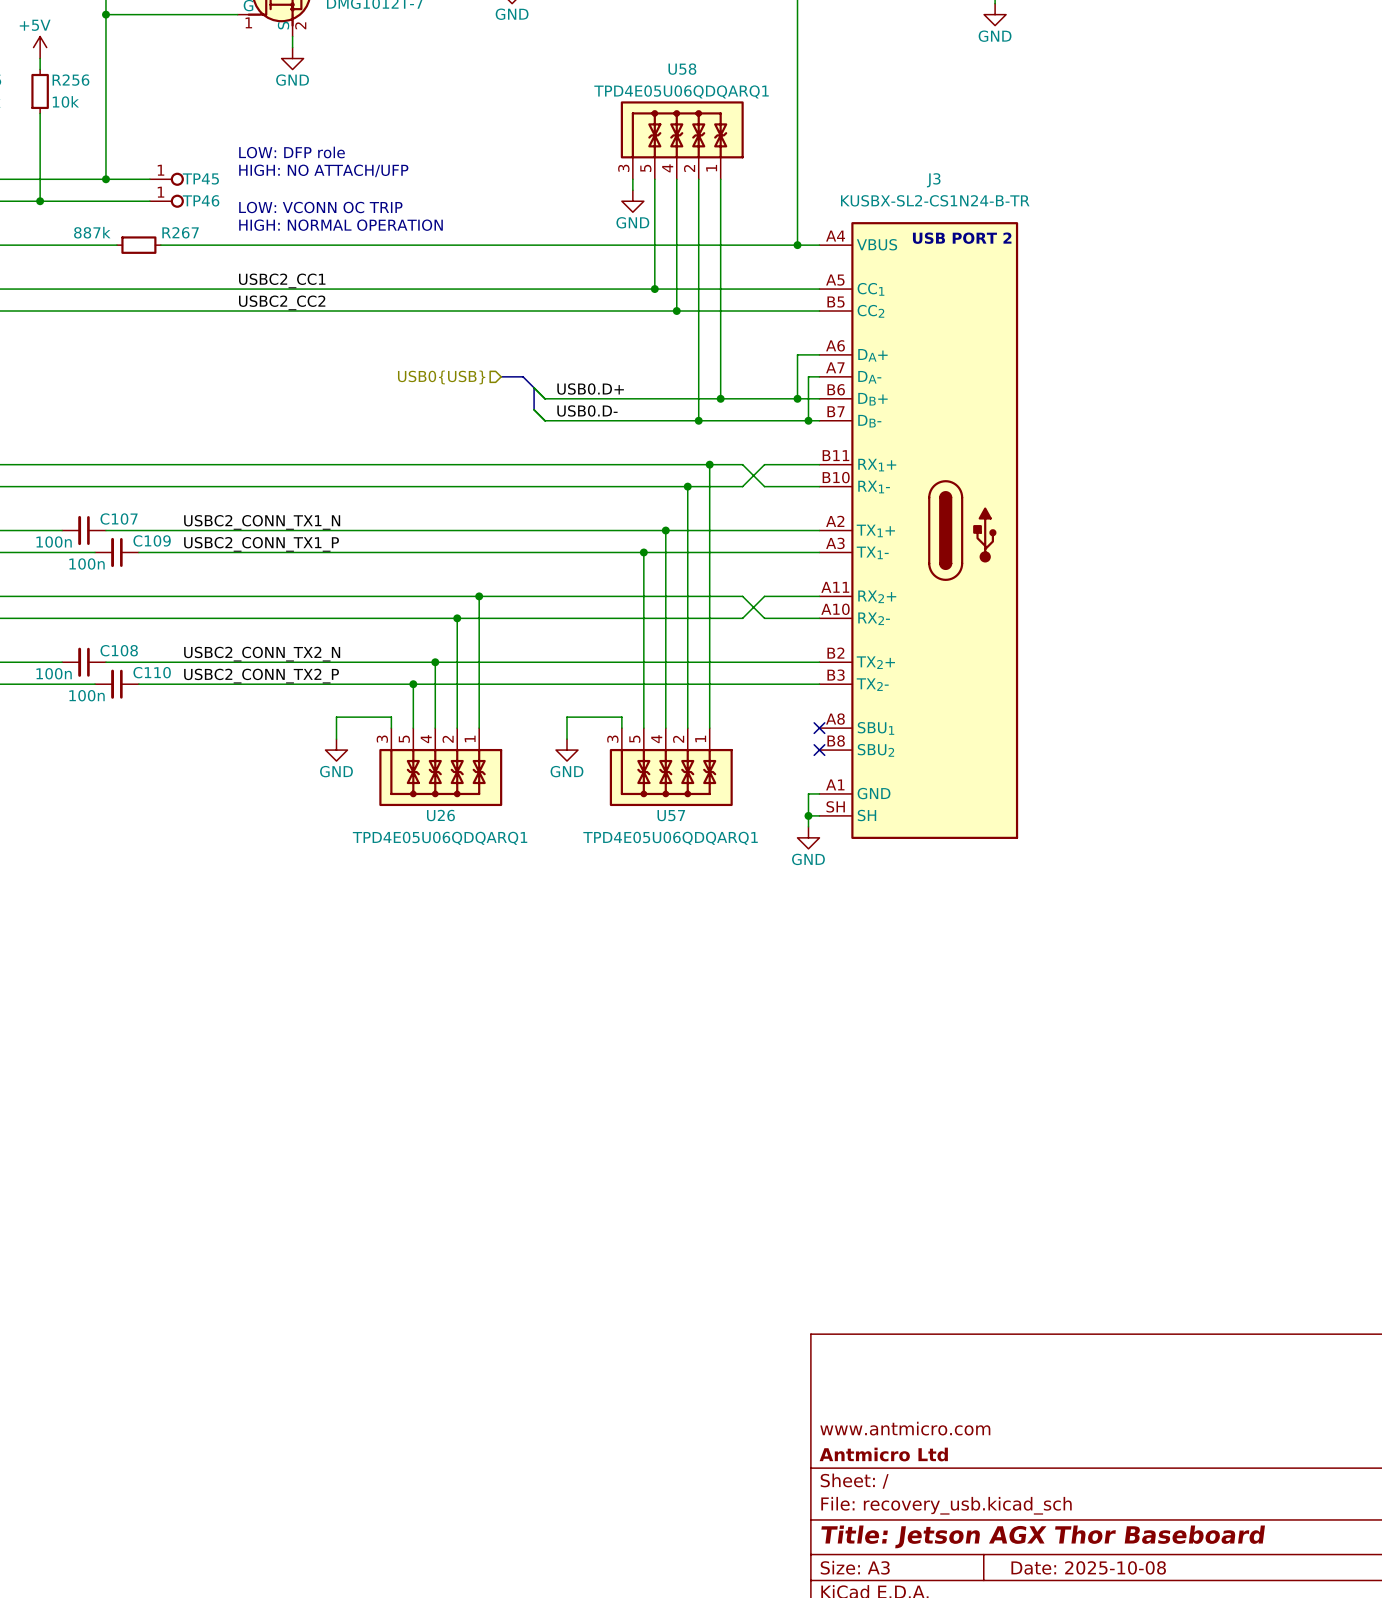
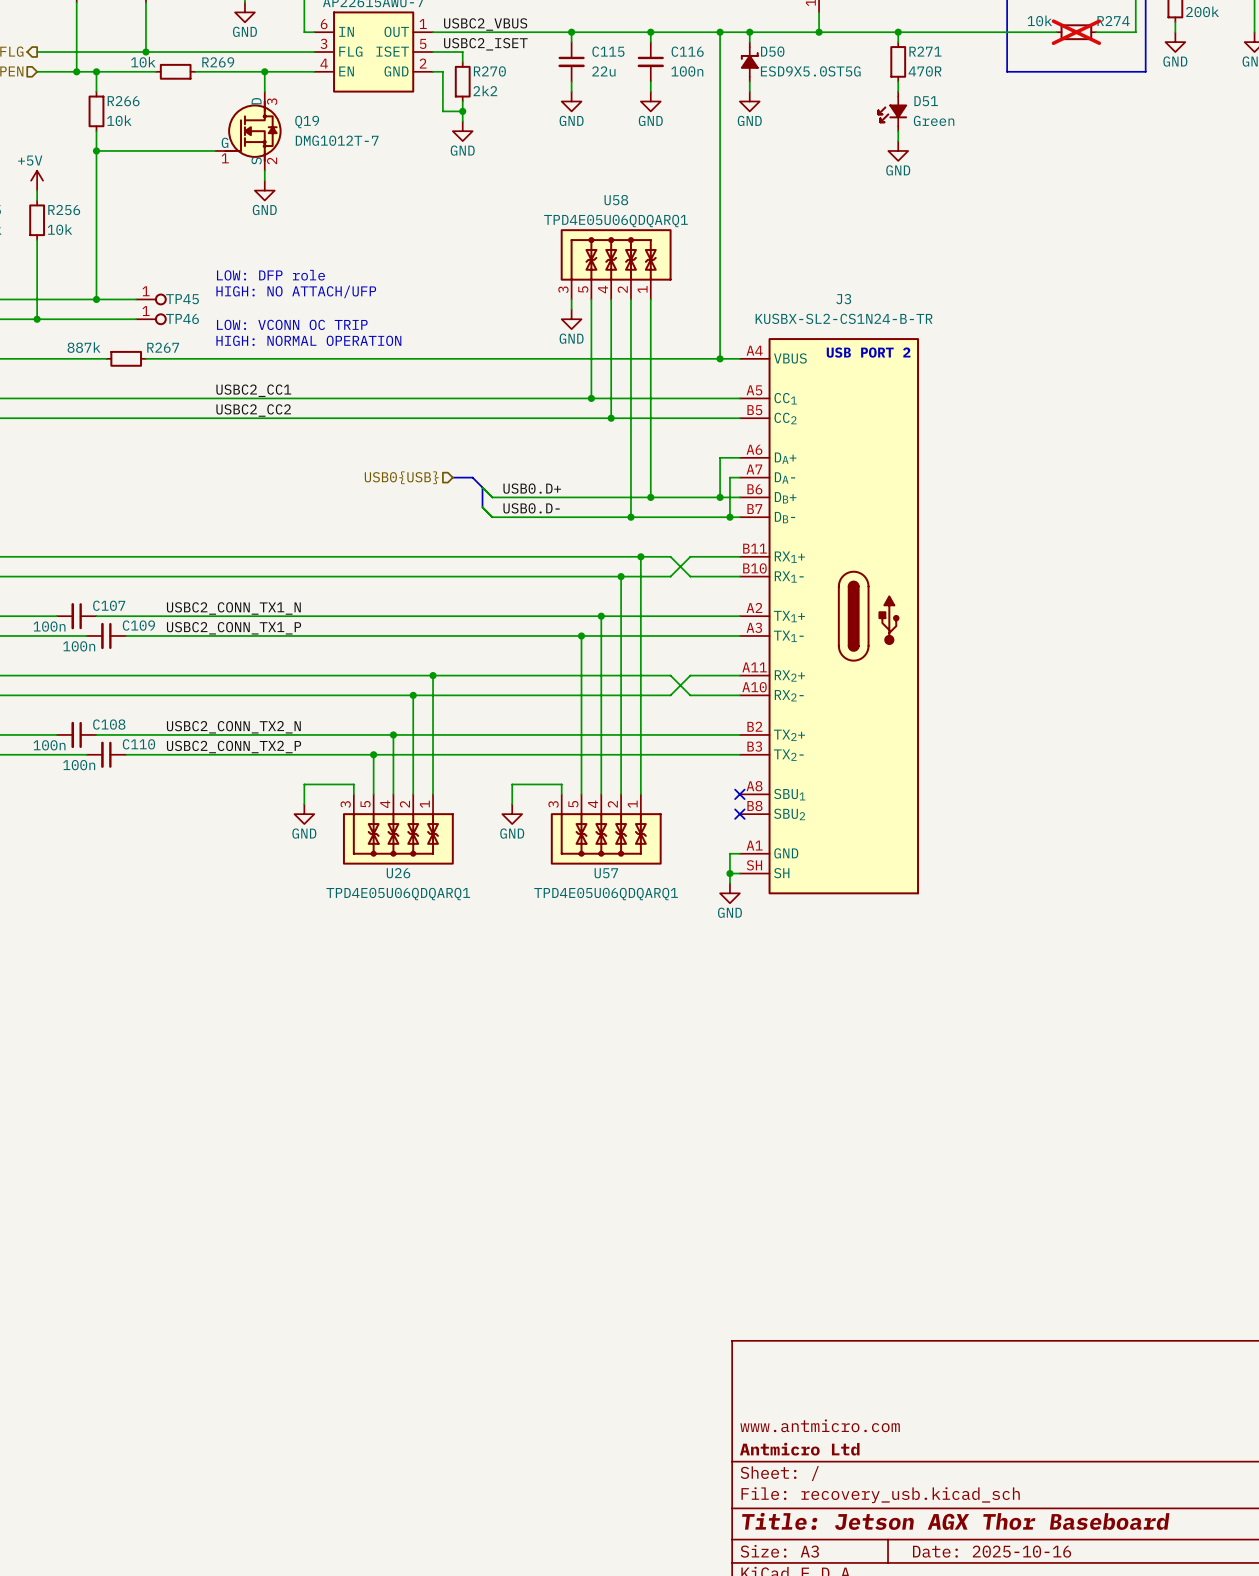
title block: Date: 2025-10-08 (1088, 1567) -> Date: 2025-10-16 (992, 1551)

